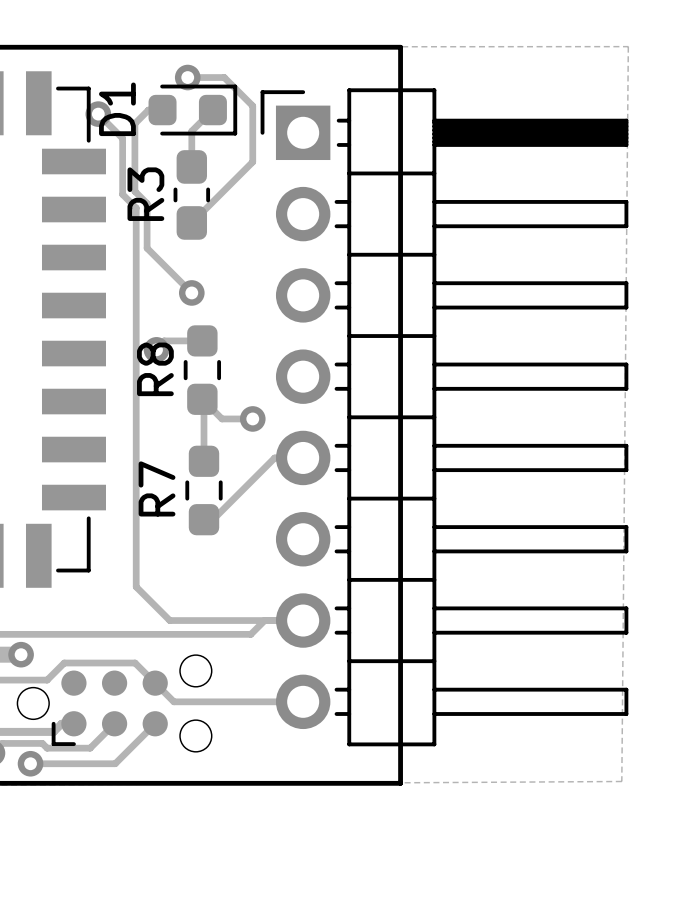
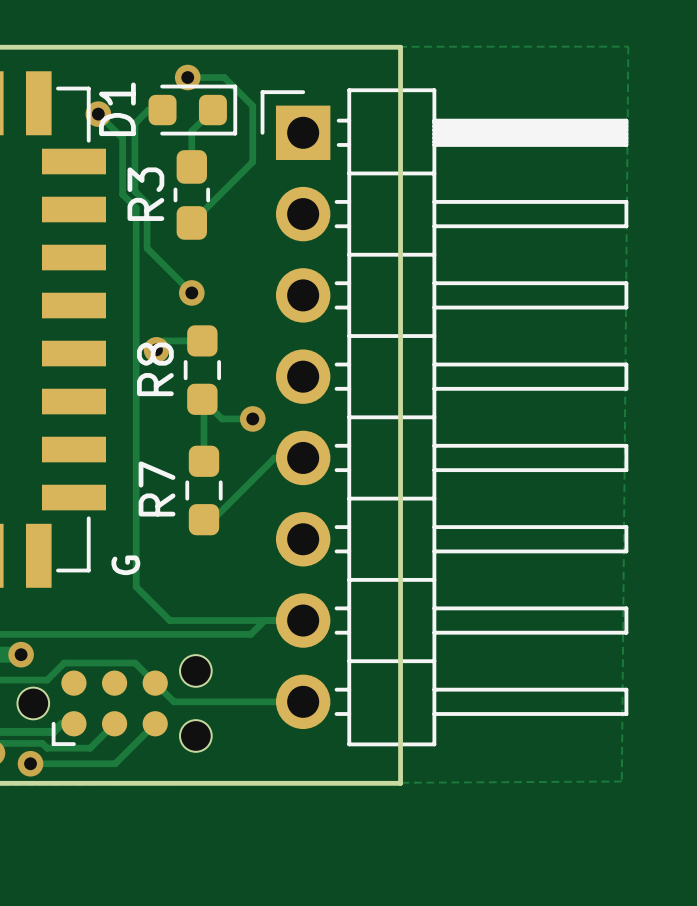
text: none -> G (125, 565)

